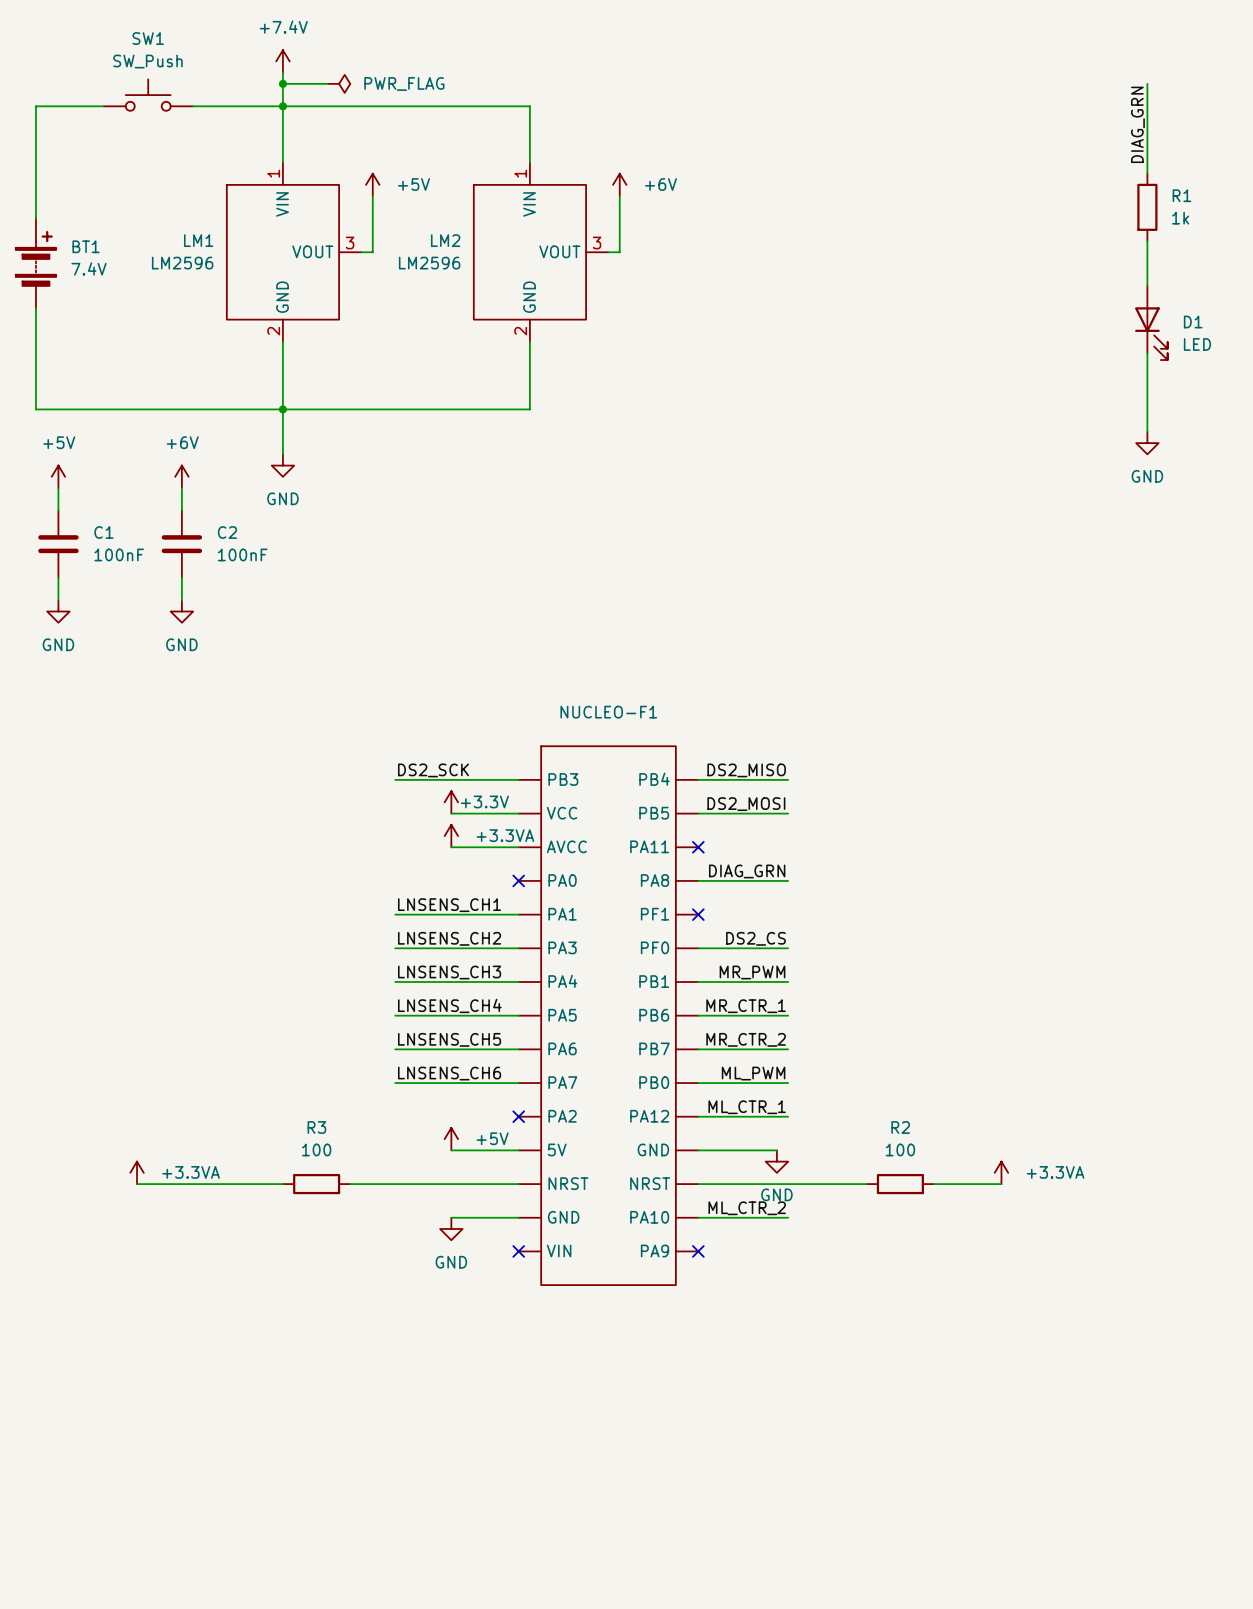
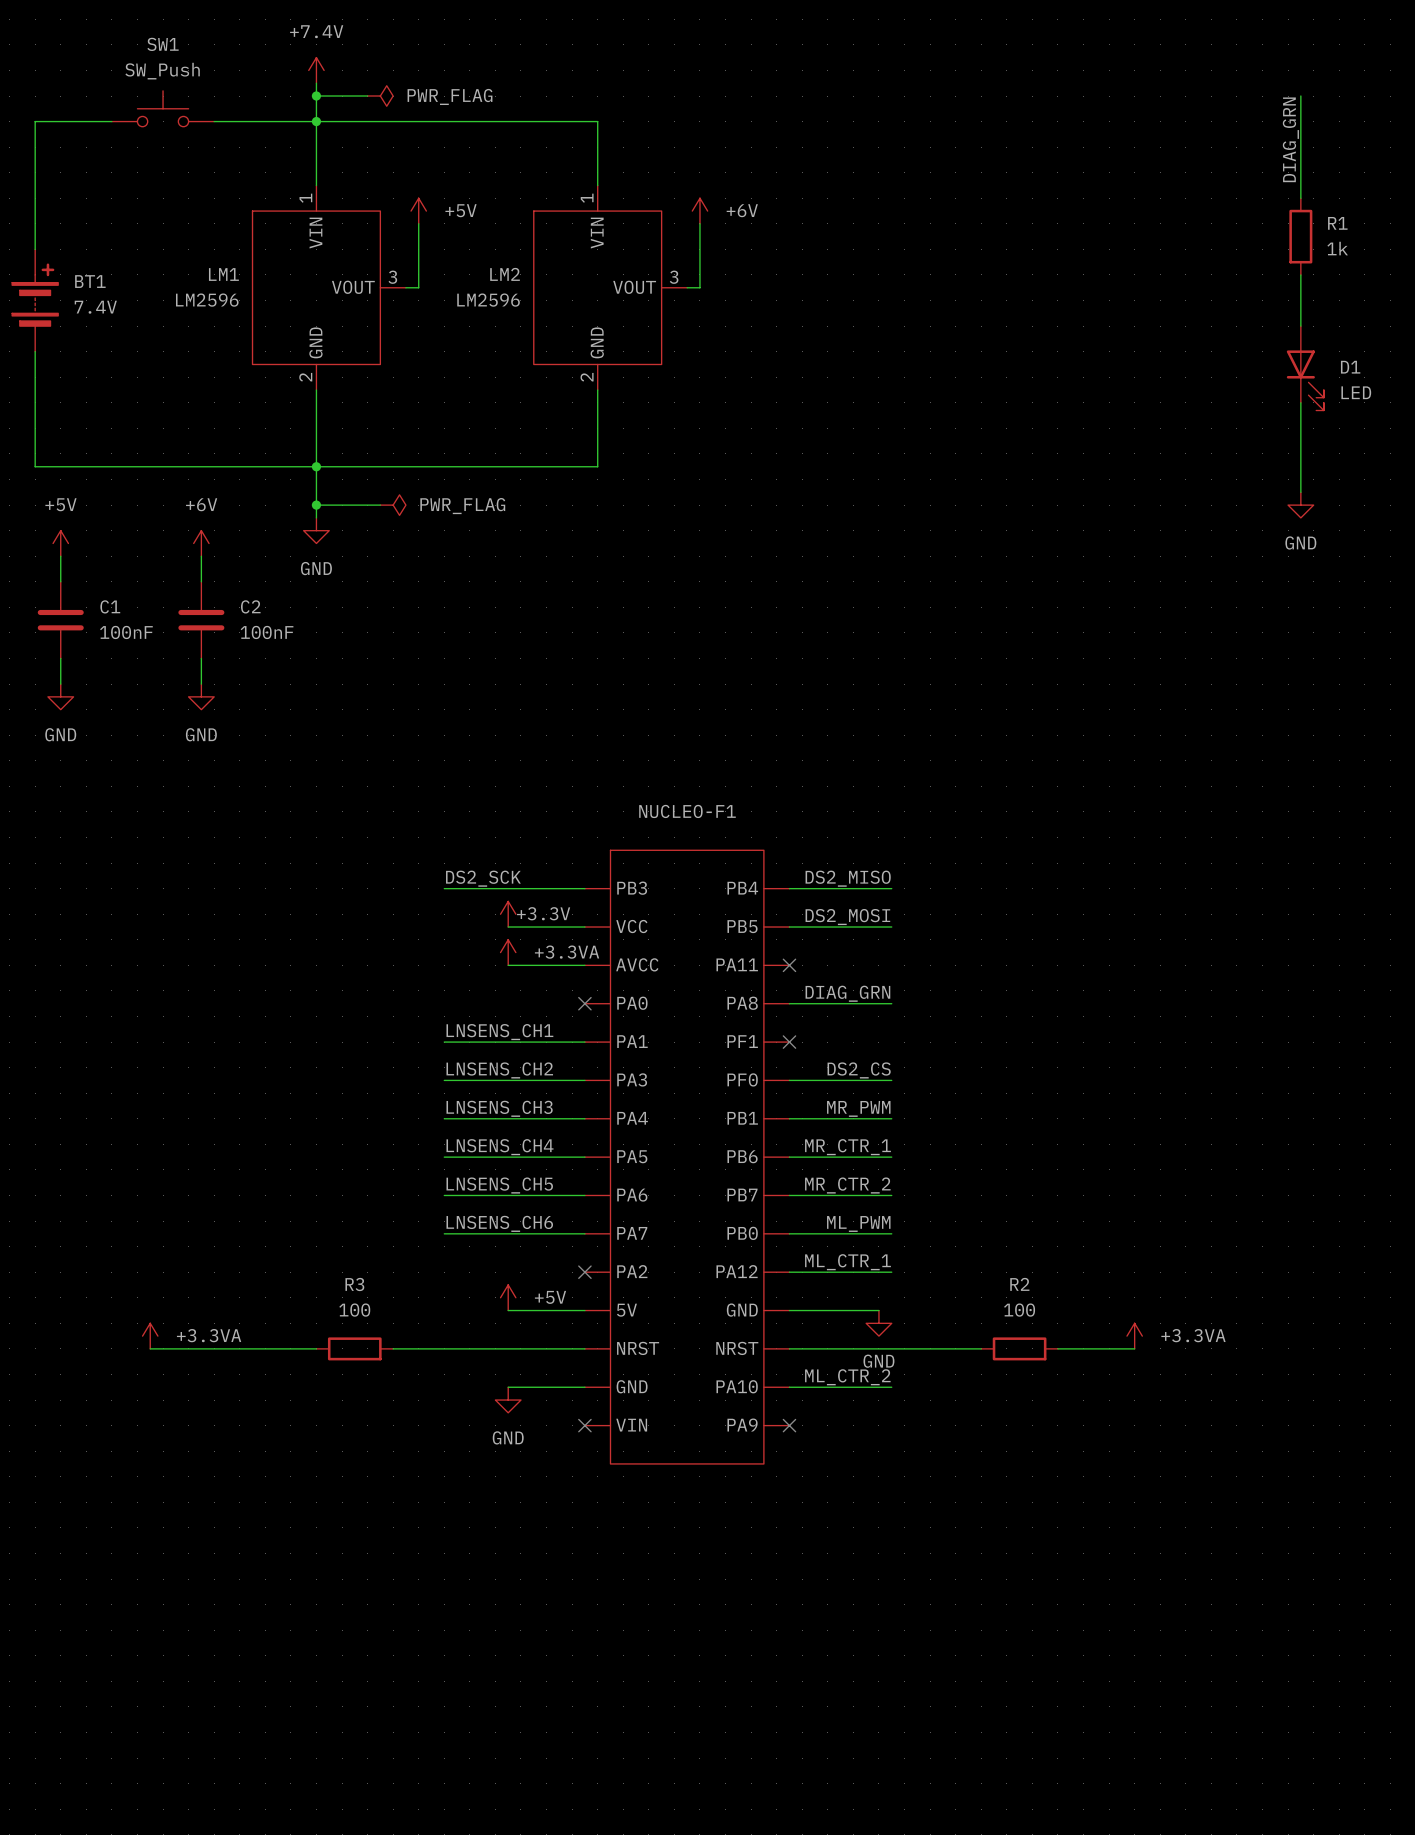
wire: none -> (316, 505) (380, 505)
junction: none -> (316, 505)
power symbol: none -> PWR_FLAG (393, 505)

